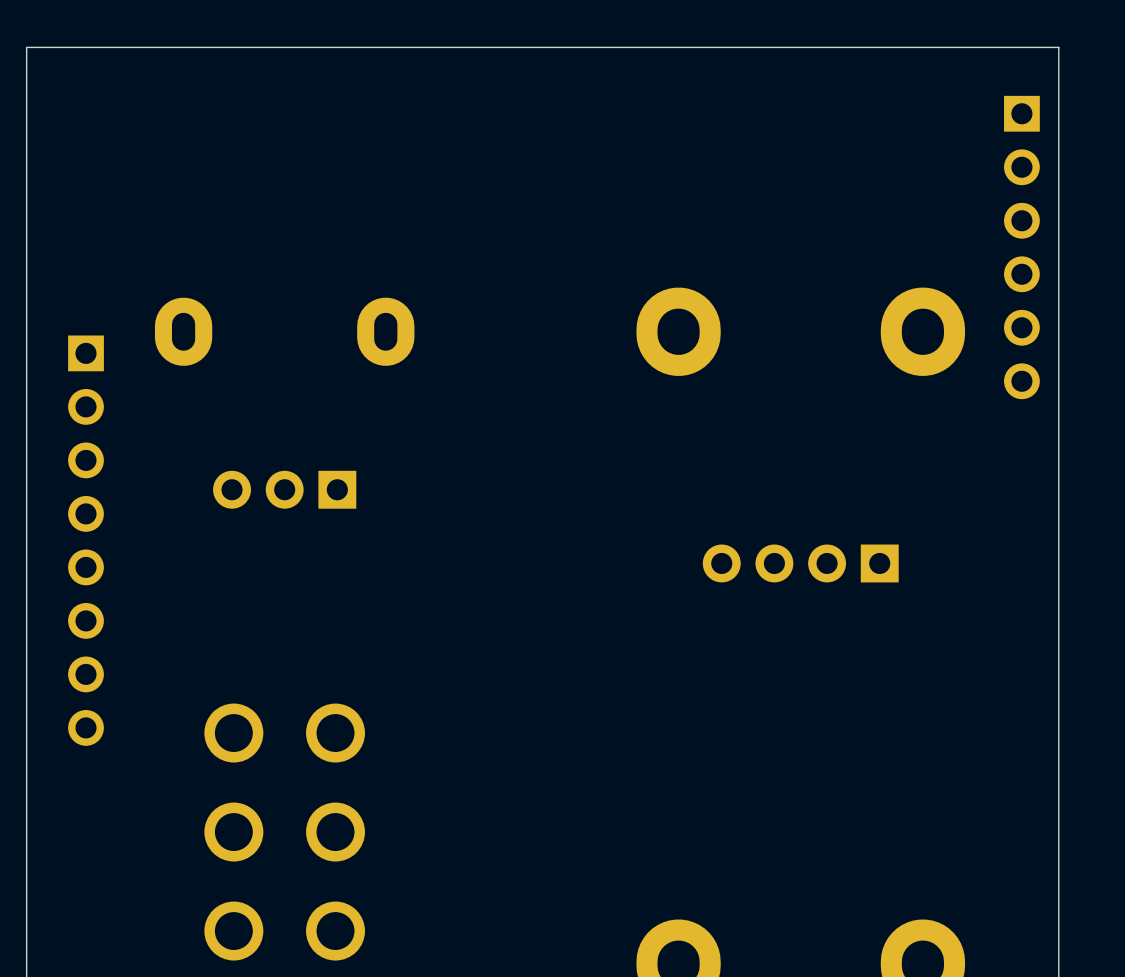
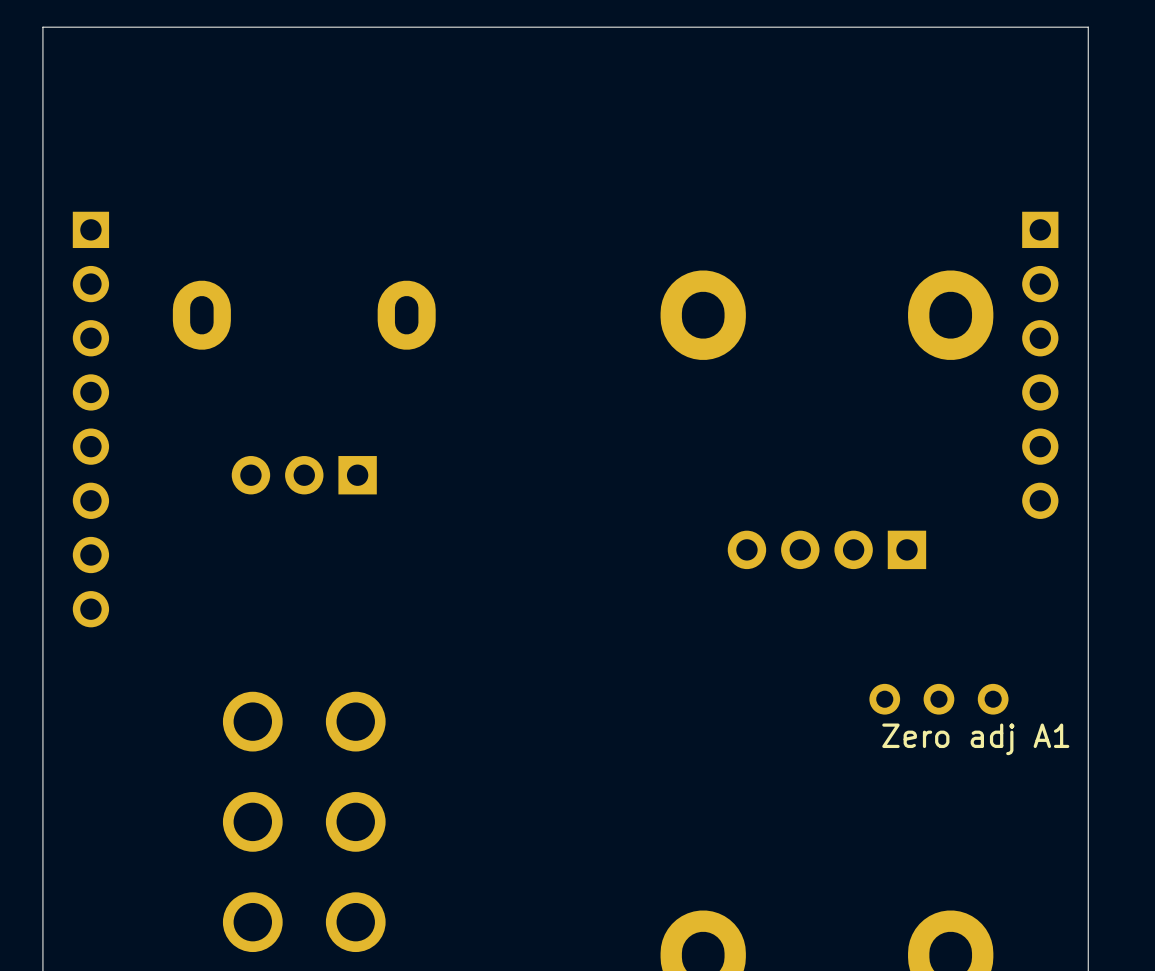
part position: (1021, 247) -> (1040, 365)
part position: (86, 540) -> (90, 419)
part: none -> (938, 699)

